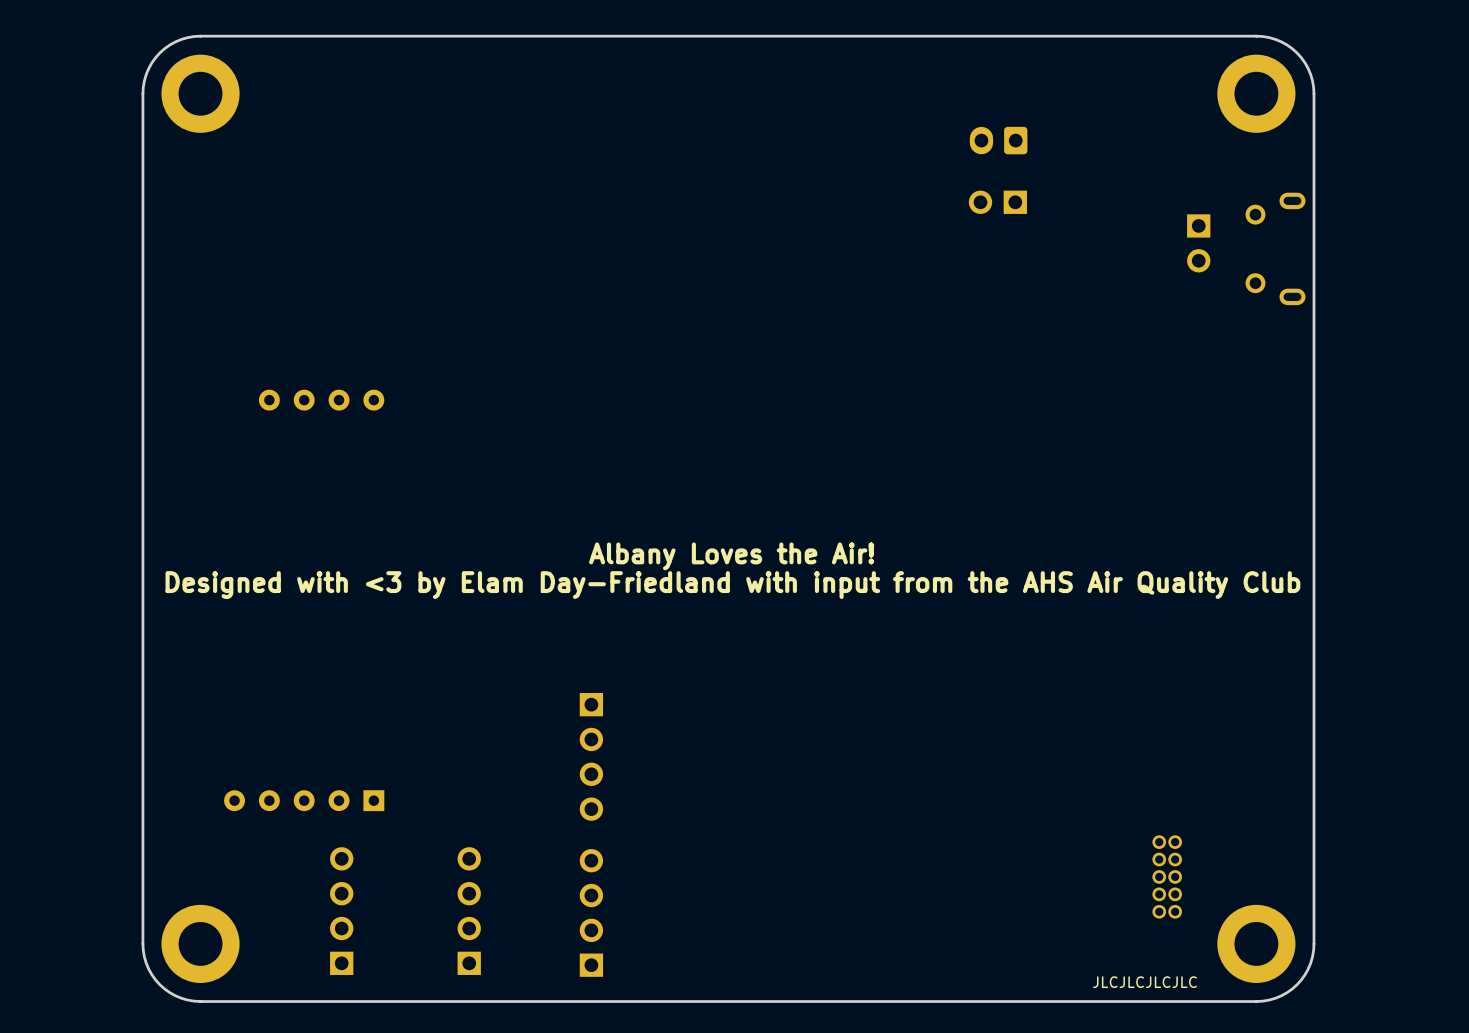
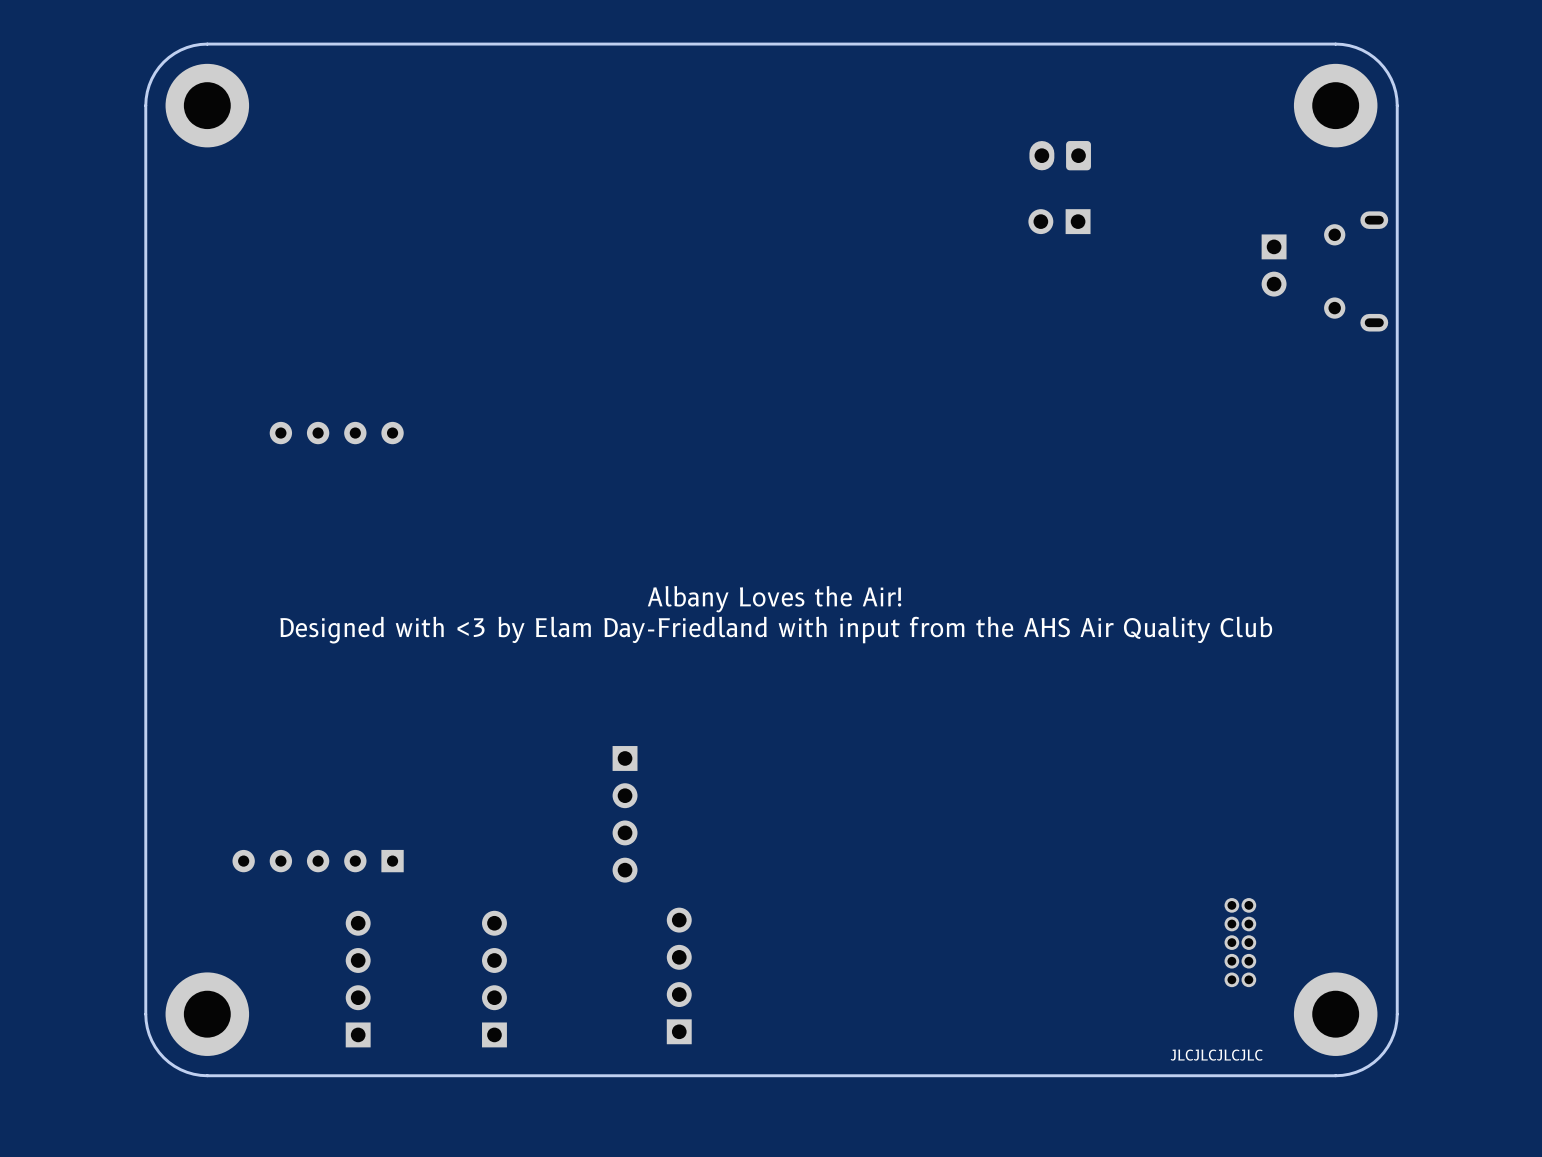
part position: (591, 912) -> (679, 975)

